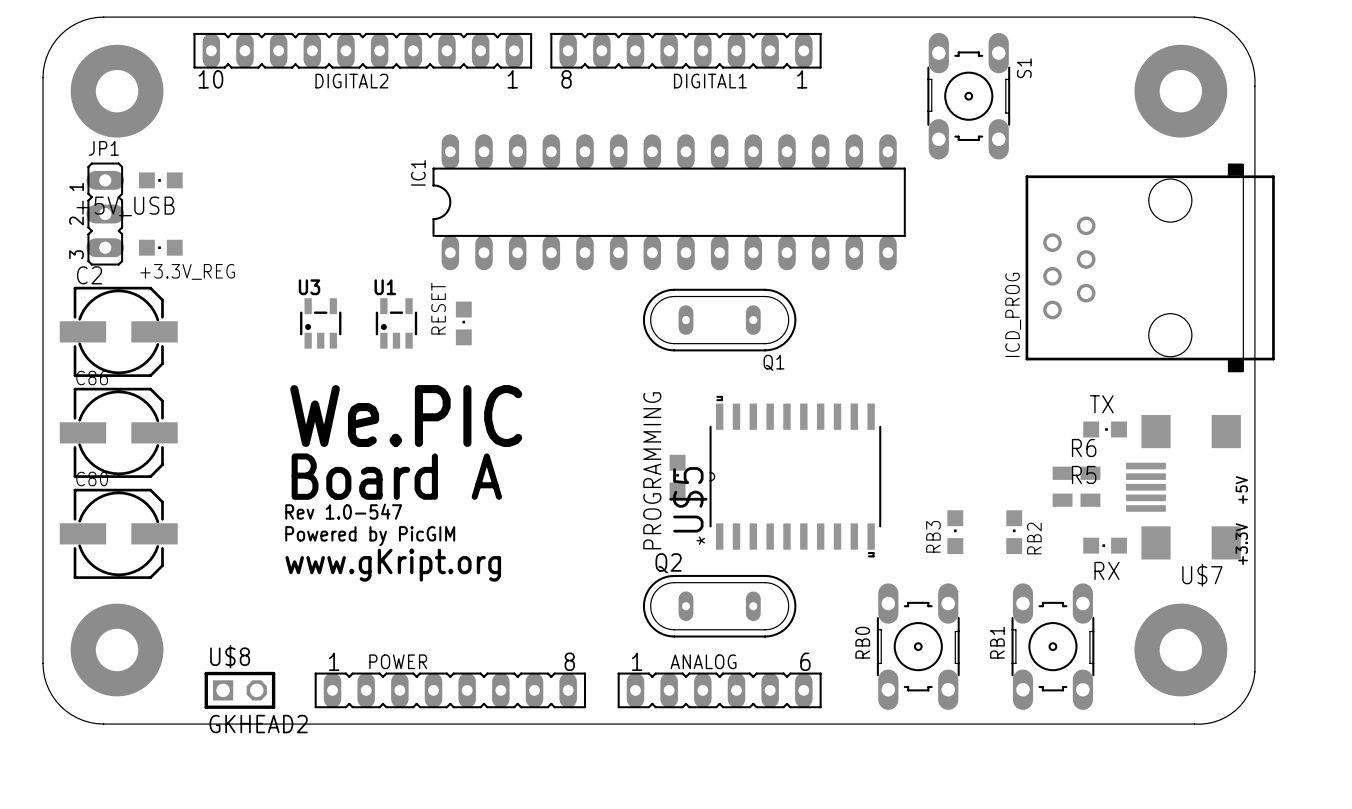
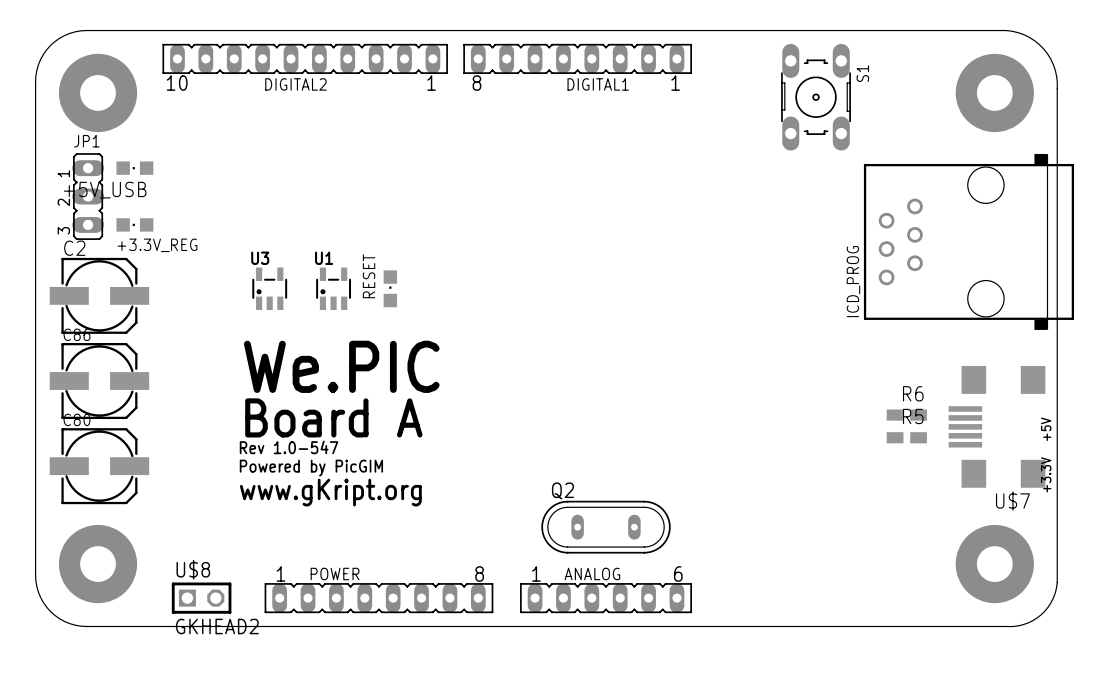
IC1: (669, 202) -> none
Q1: (719, 320) -> none
TX: (1105, 429) -> none
PROGRAMMING: (677, 476) -> none
U$5: (795, 476) -> none
RB3: (955, 532) -> none
RB2: (1014, 532) -> none
RX: (1105, 545) -> none
RB0: (918, 646) -> none
RB1: (1052, 646) -> none

